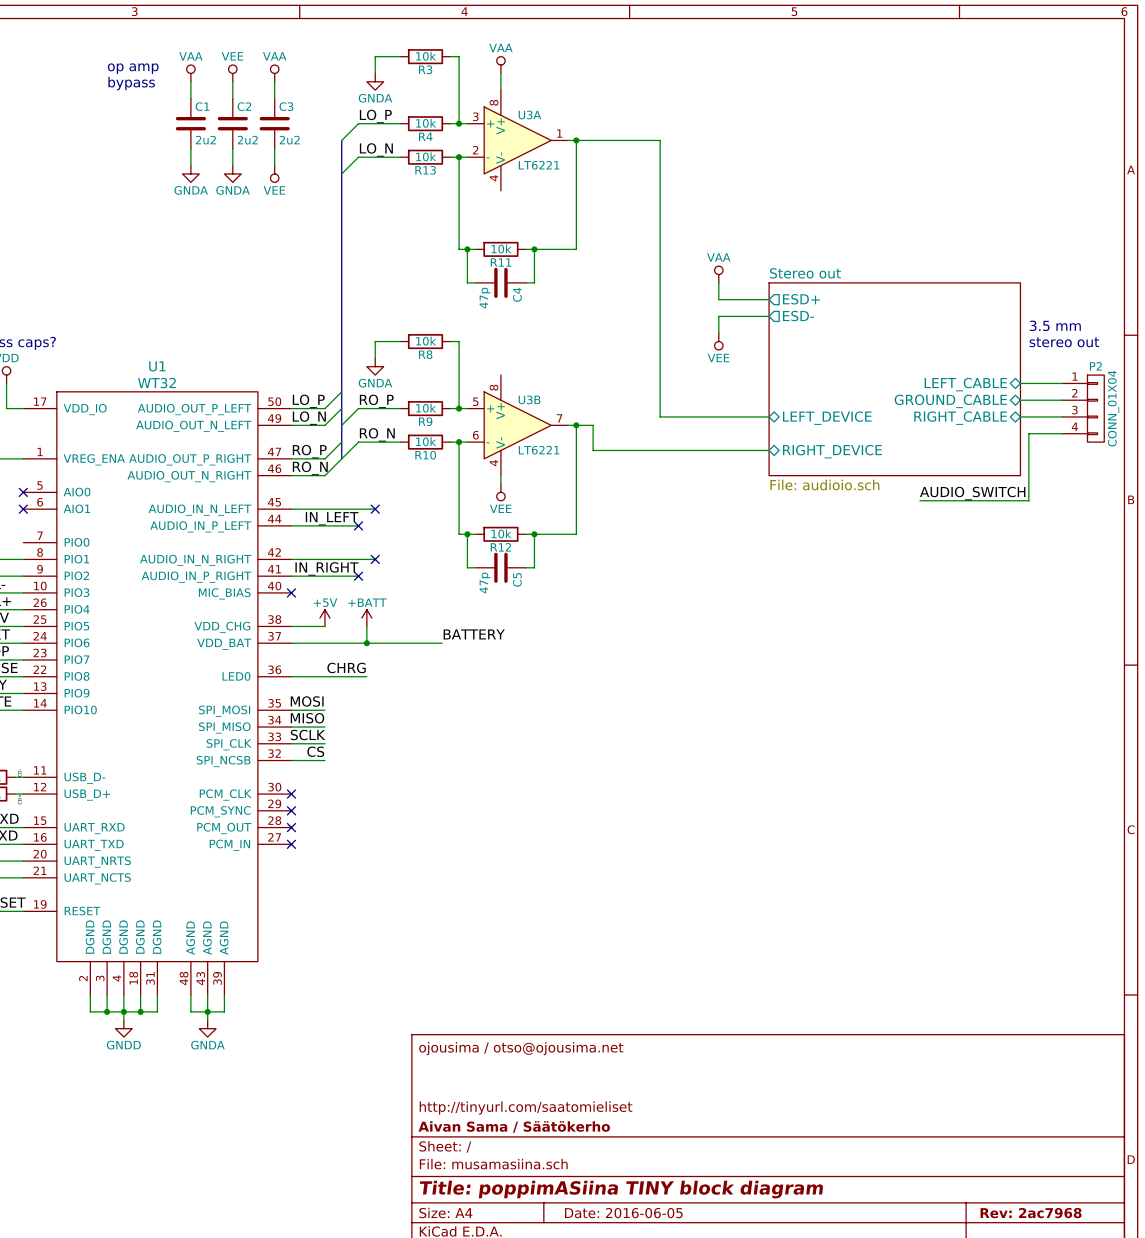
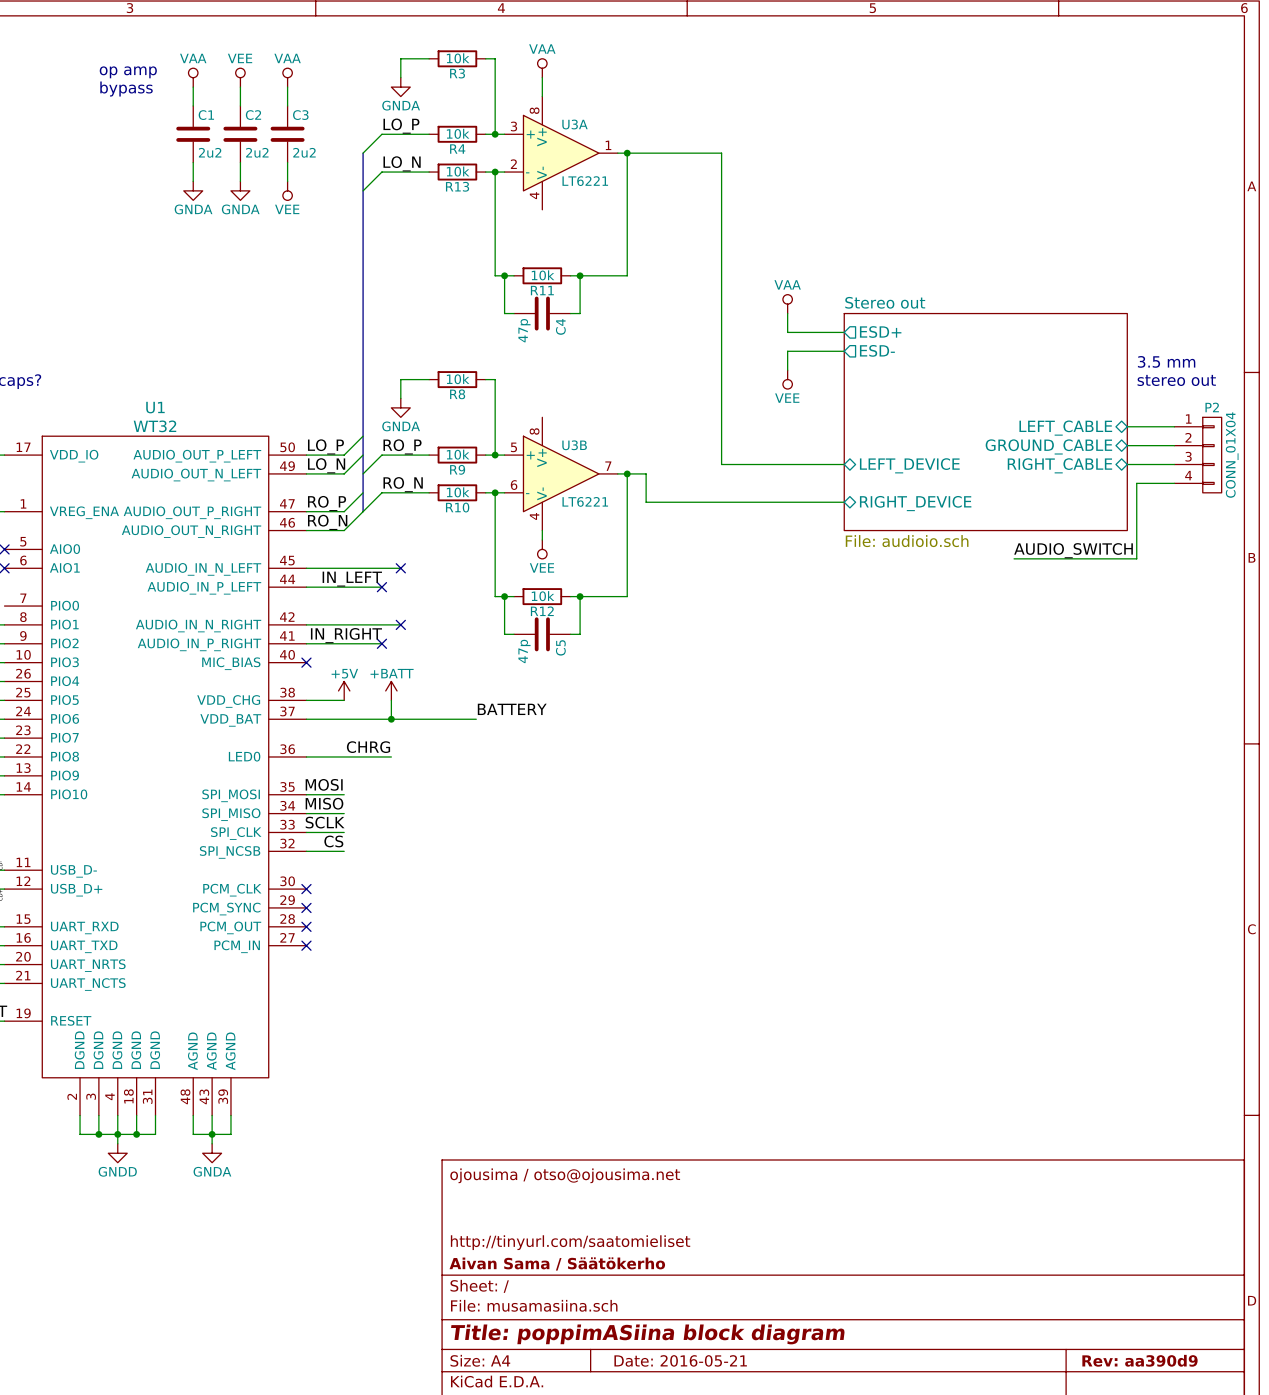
title block: Title: poppimASiina TINY block diagram (621, 1189) -> Title: poppimASiina block diagram (647, 1334)
title block: Date: 2016-06-05 (623, 1213) -> Date: 2016-05-21 (680, 1360)
title block: Rev: 2ac7968 (1031, 1213) -> Rev: aa390d9 (1139, 1360)

